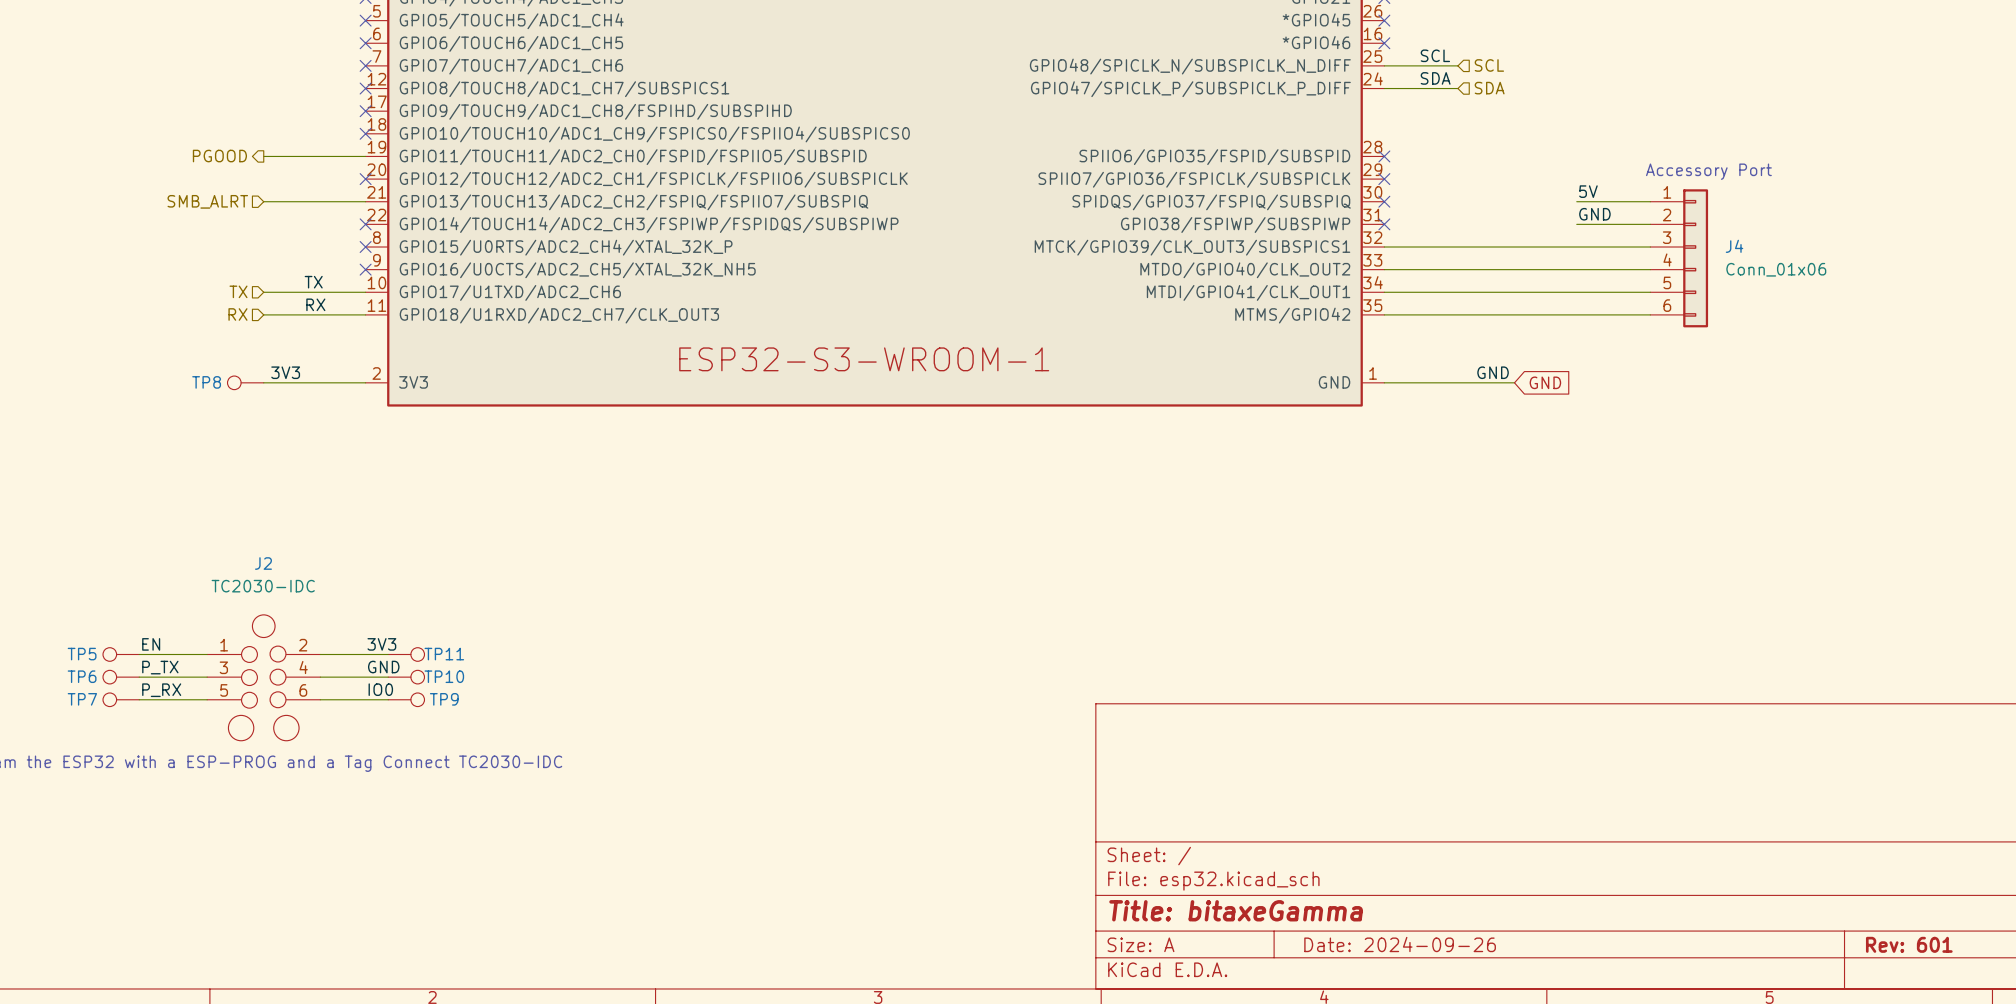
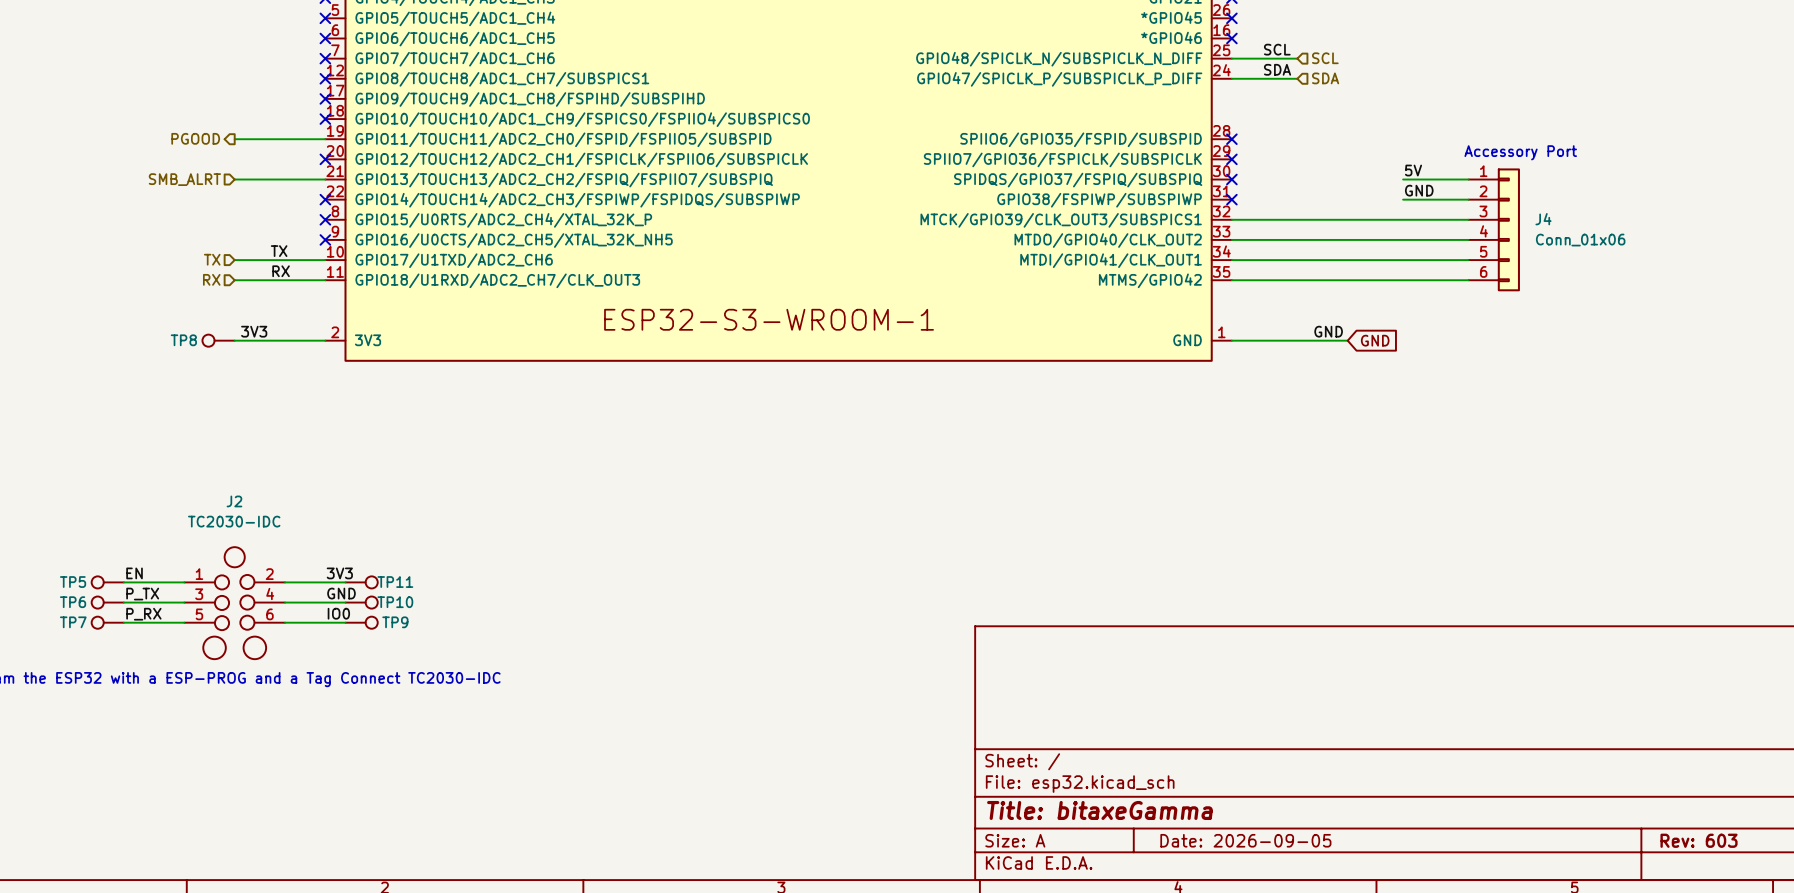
title block: Date: 2024-09-26 (1400, 944) -> Date: 2026-09-05 (1245, 840)
title block: Rev: 601 (1909, 944) -> Rev: 603 (1699, 840)

